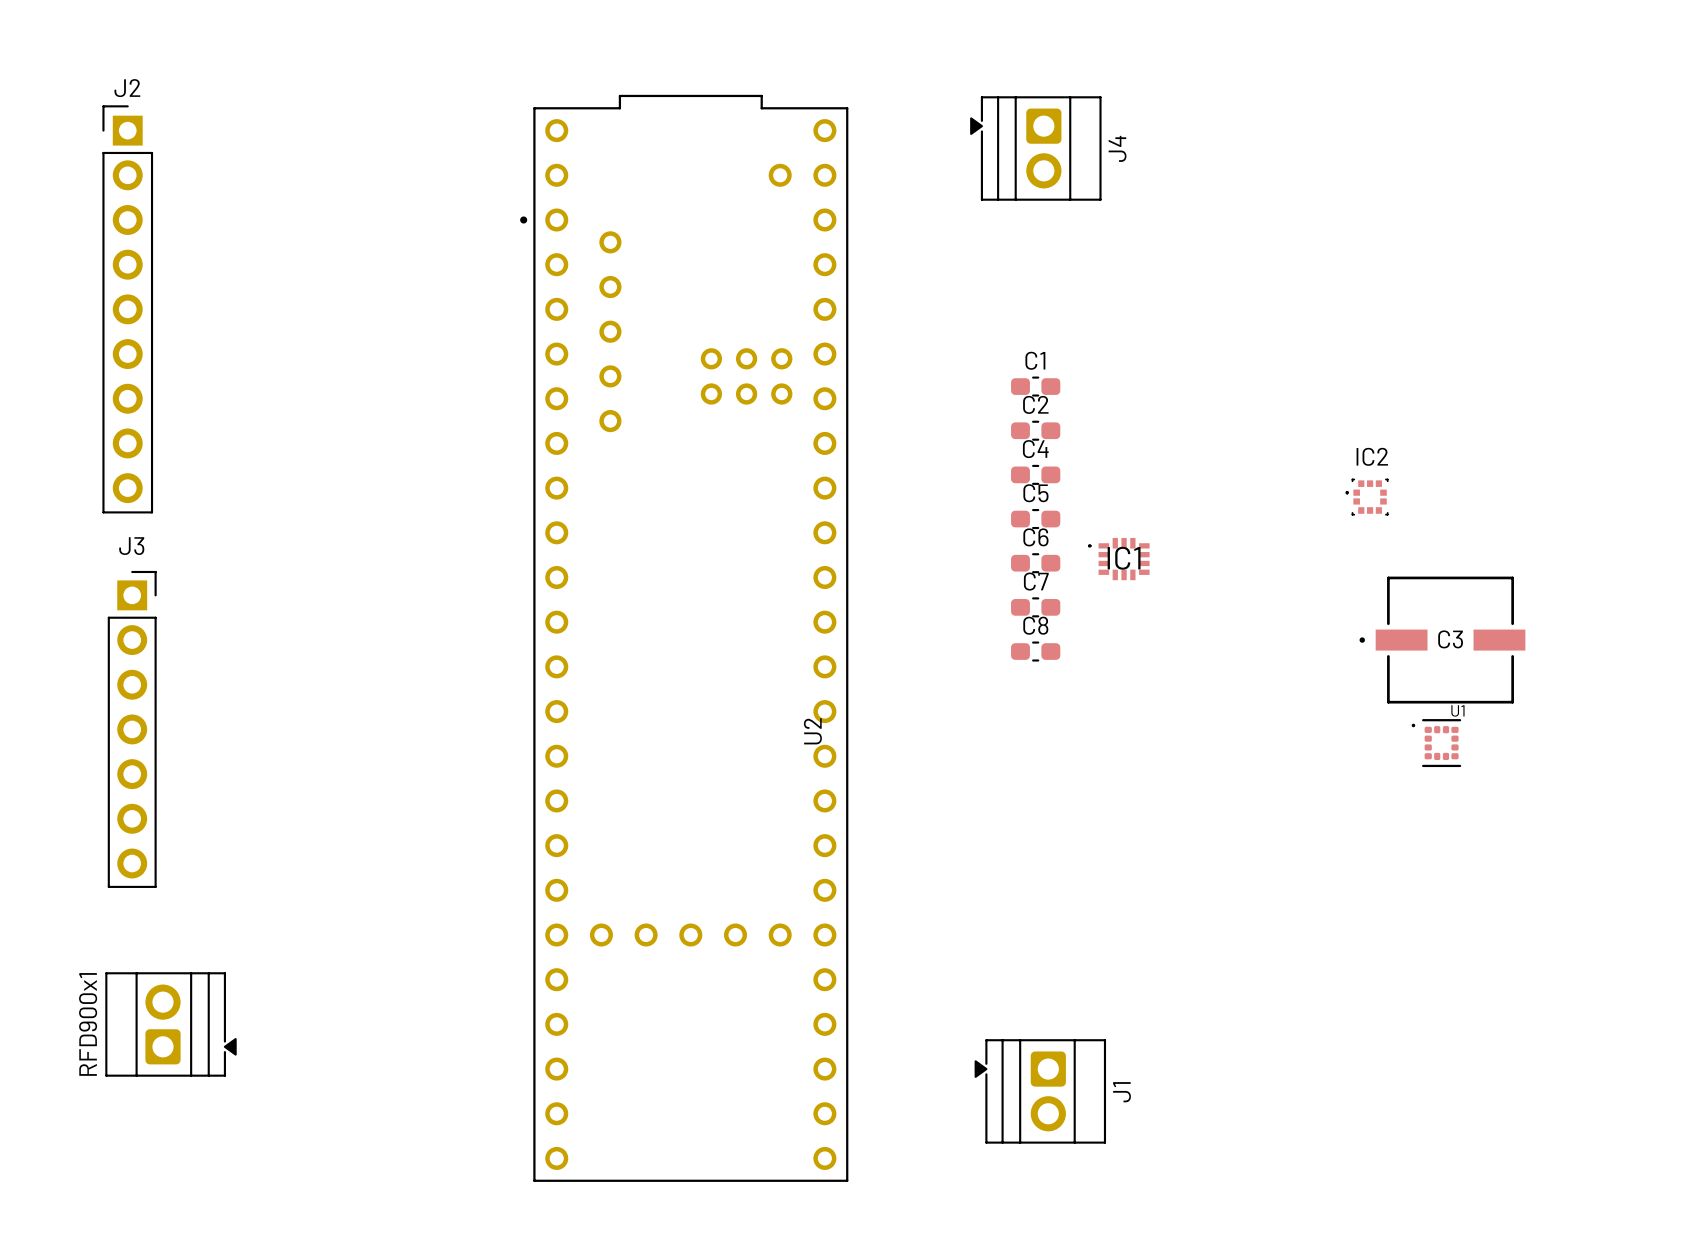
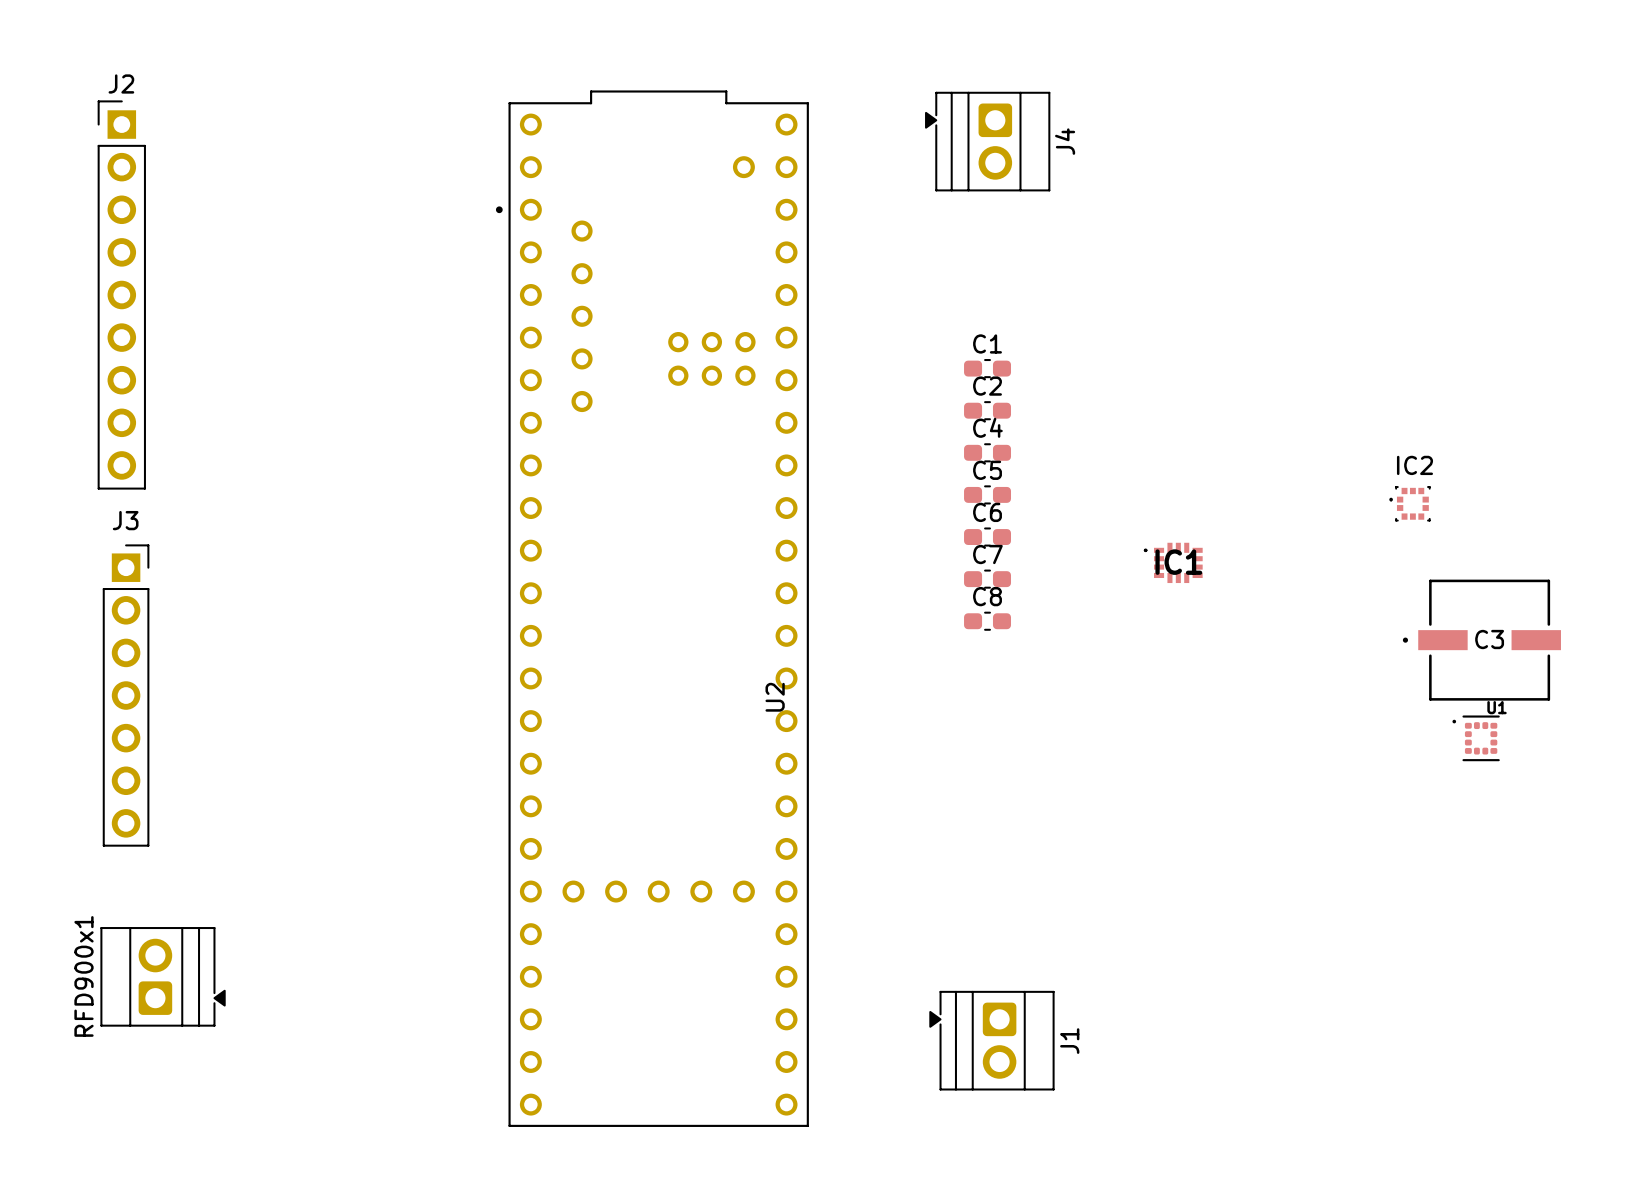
IC2 position: (1367, 497) -> (1409, 503)
IC1 position: (1118, 559) -> (1173, 562)
C3 position: (1442, 640) -> (1481, 640)
U1 position: (1436, 743) -> (1476, 738)

